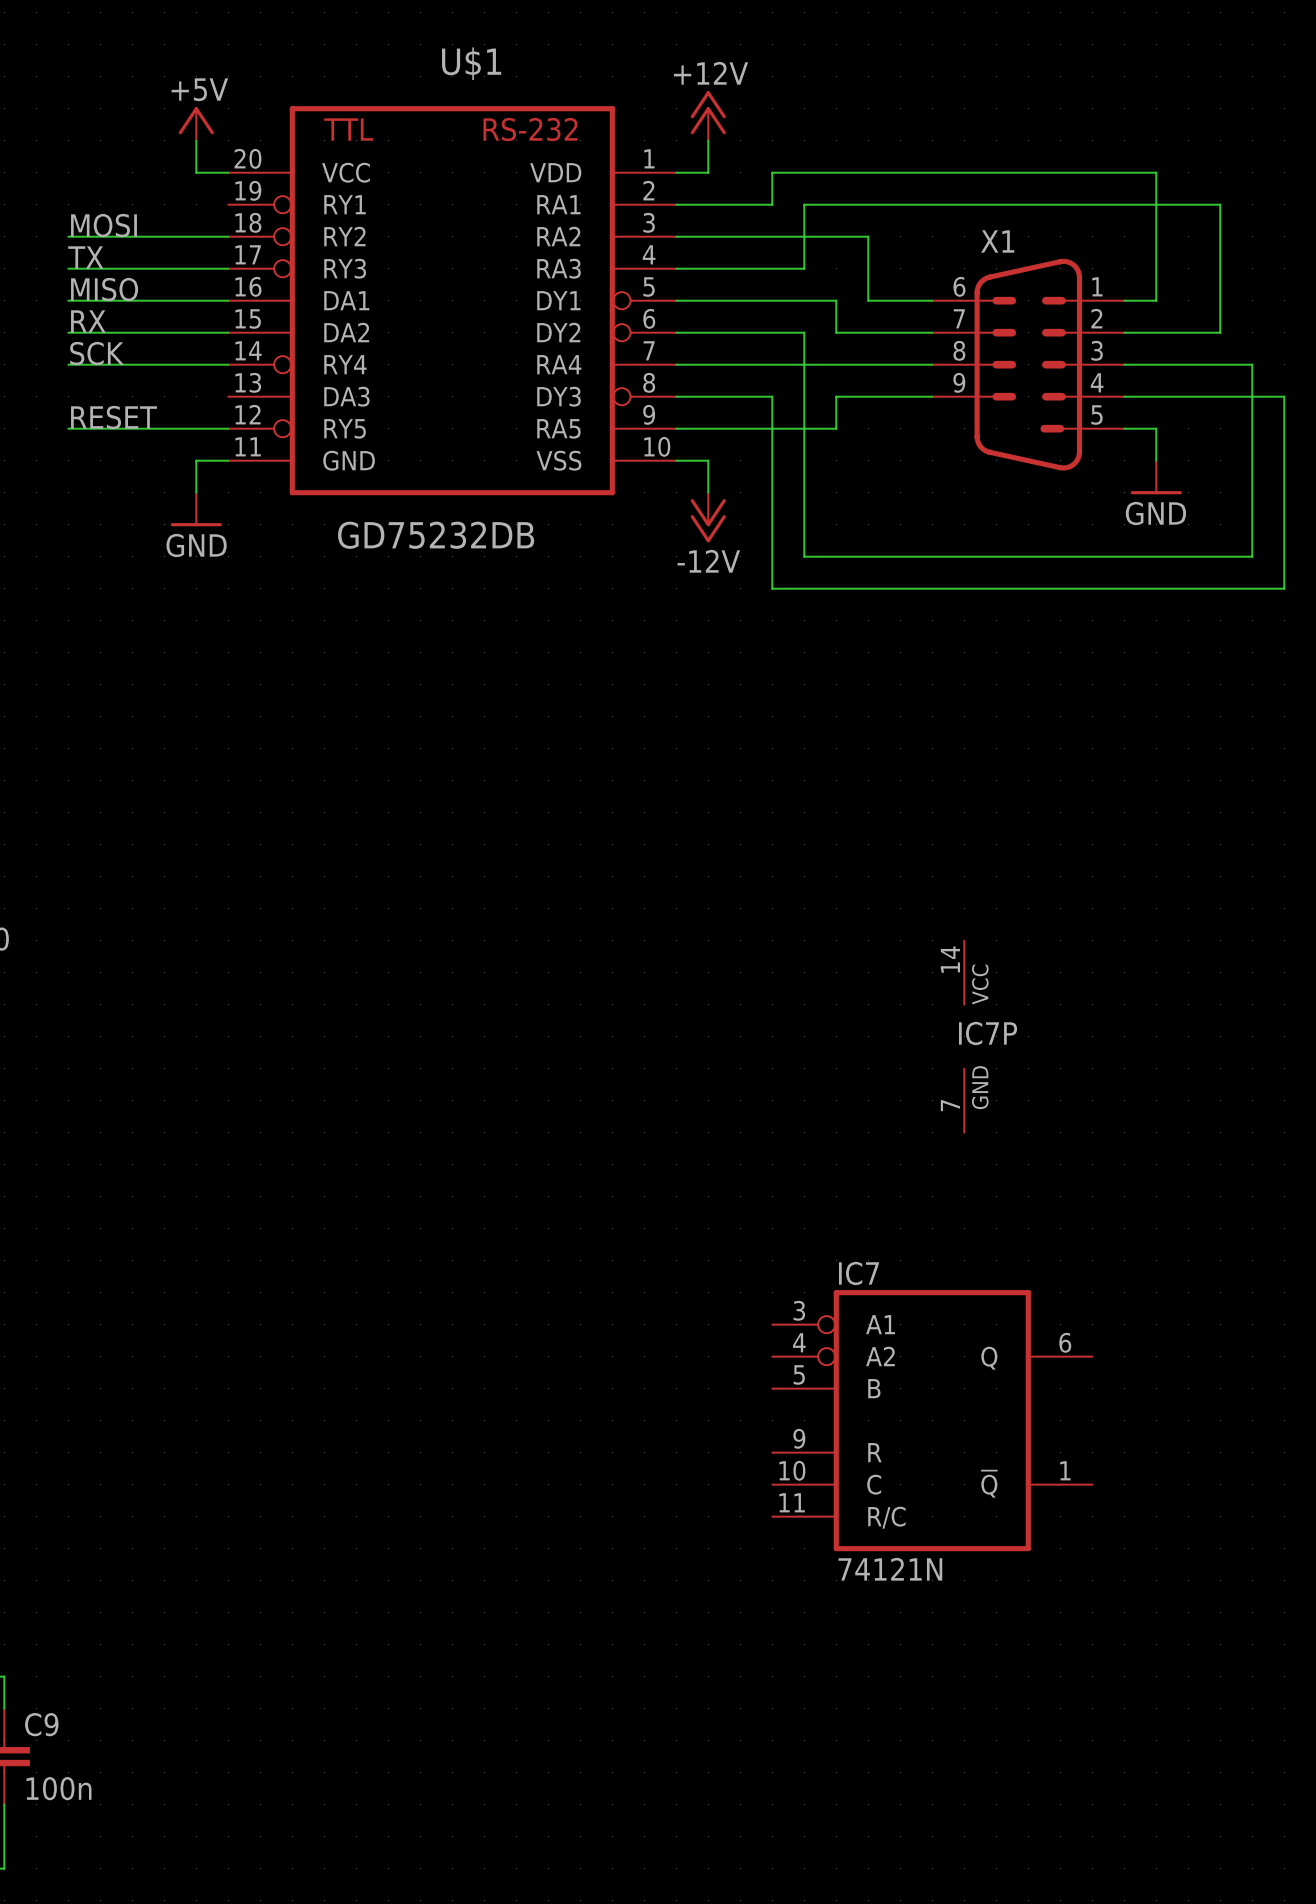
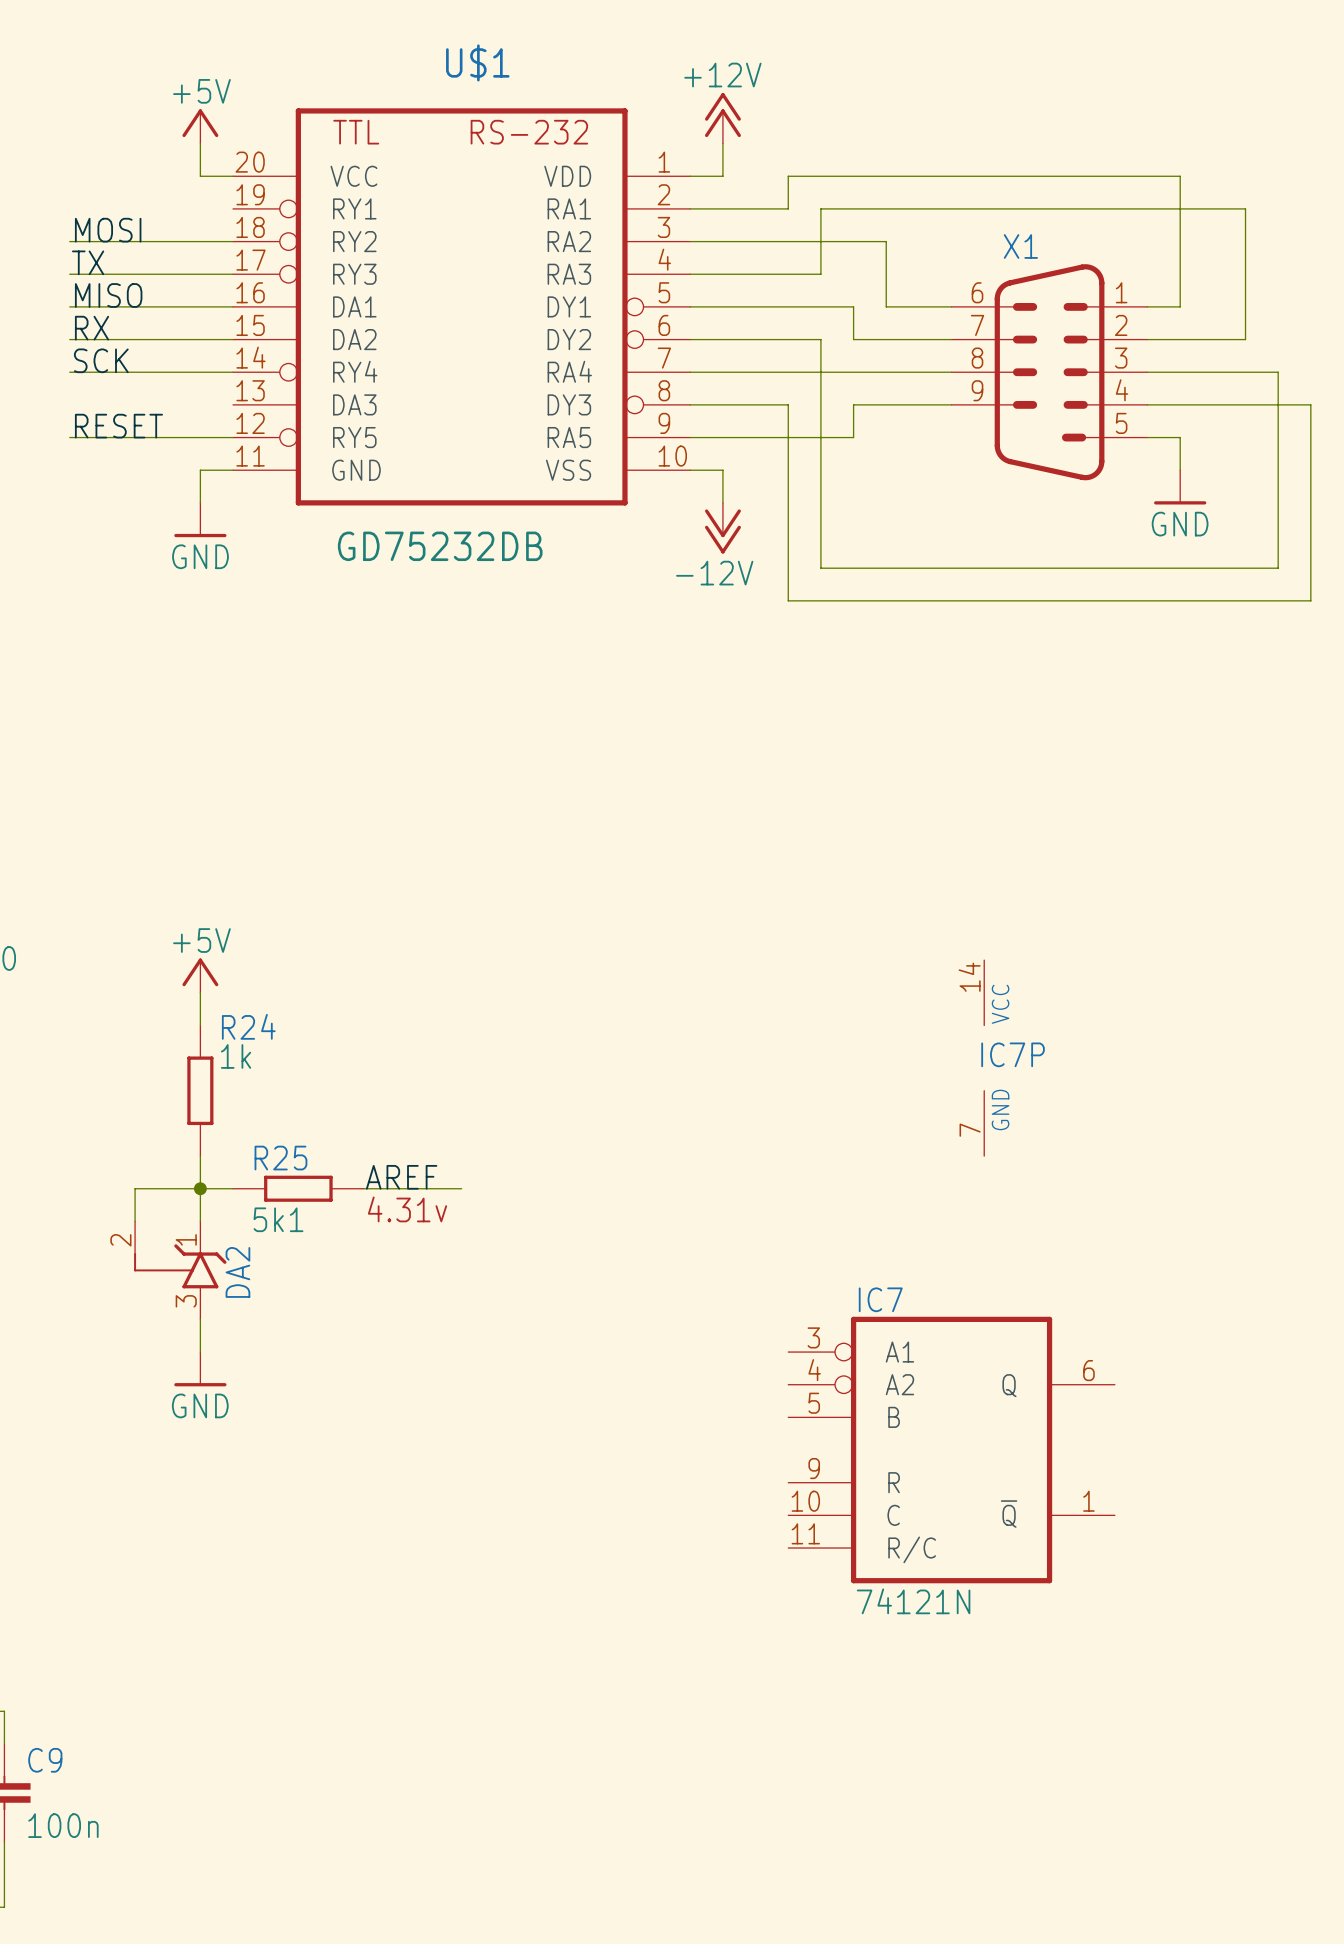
power symbol: none -> +5V (200, 975)
wire: none -> (200, 992) (200, 1025)
R24: none -> 1k (200, 1090)
wire: none -> (200, 1156) (200, 1221)
label: none -> AREF (401, 1177)
junction: none -> (200, 1188)
wire: none -> (233, 1188) (135, 1188) (135, 1221)
R25: none -> 5k1 (298, 1188)
wire: none -> (363, 1188) (461, 1188)
text: none -> 4.31v (407, 1209)
DA2: none -> (180, 1270)
wire: none -> (200, 1319) (200, 1352)
power symbol: none -> GND (200, 1369)

